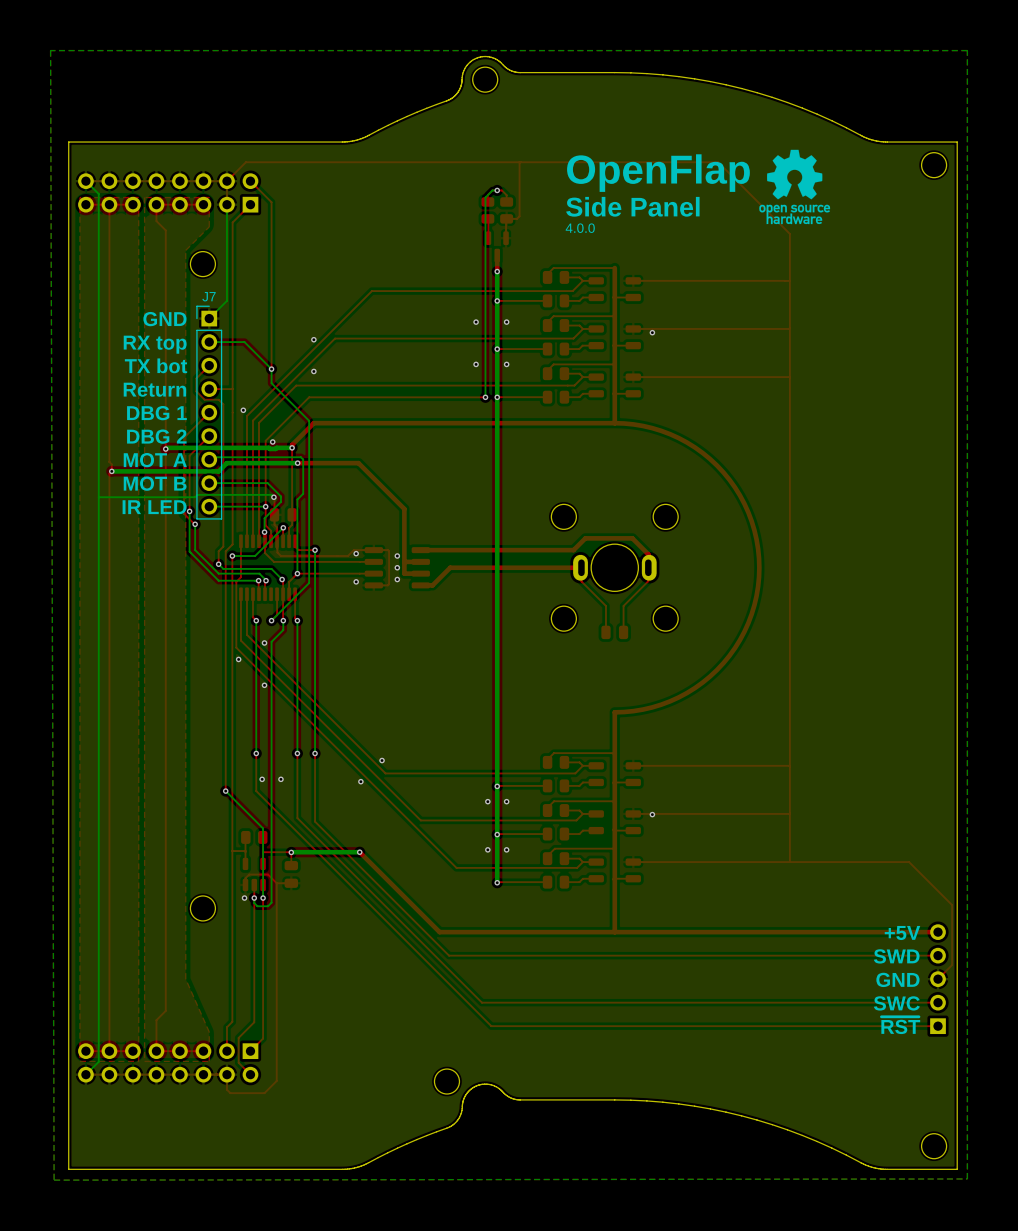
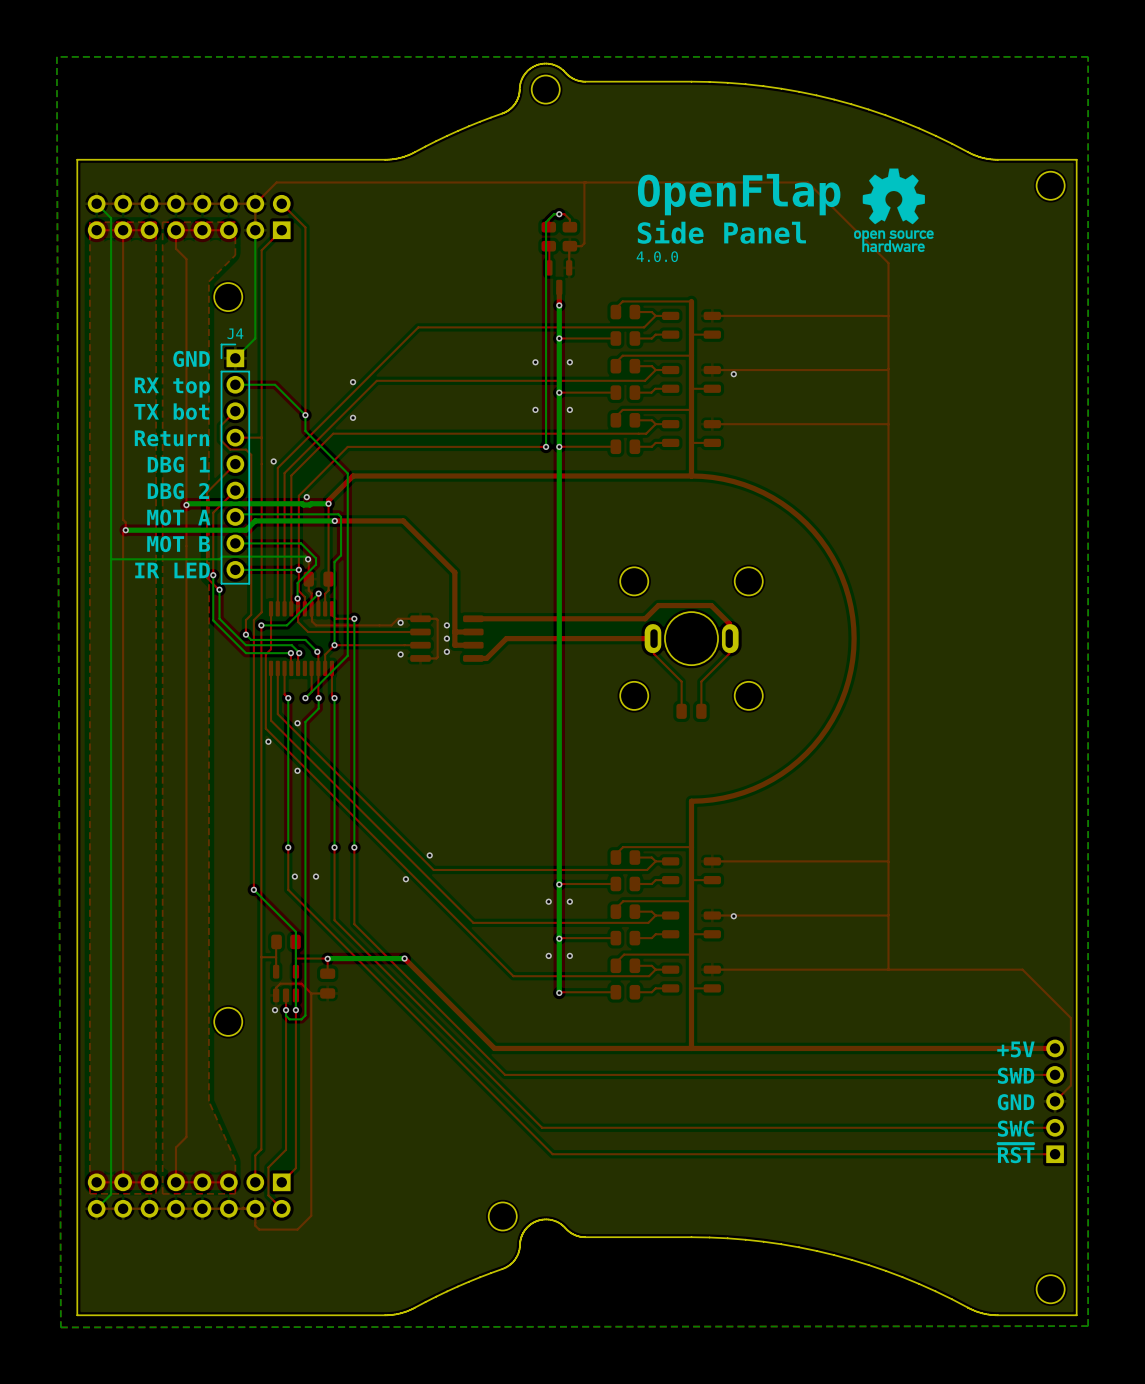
J7 name: J7 (209, 296) -> J4 (235, 333)

